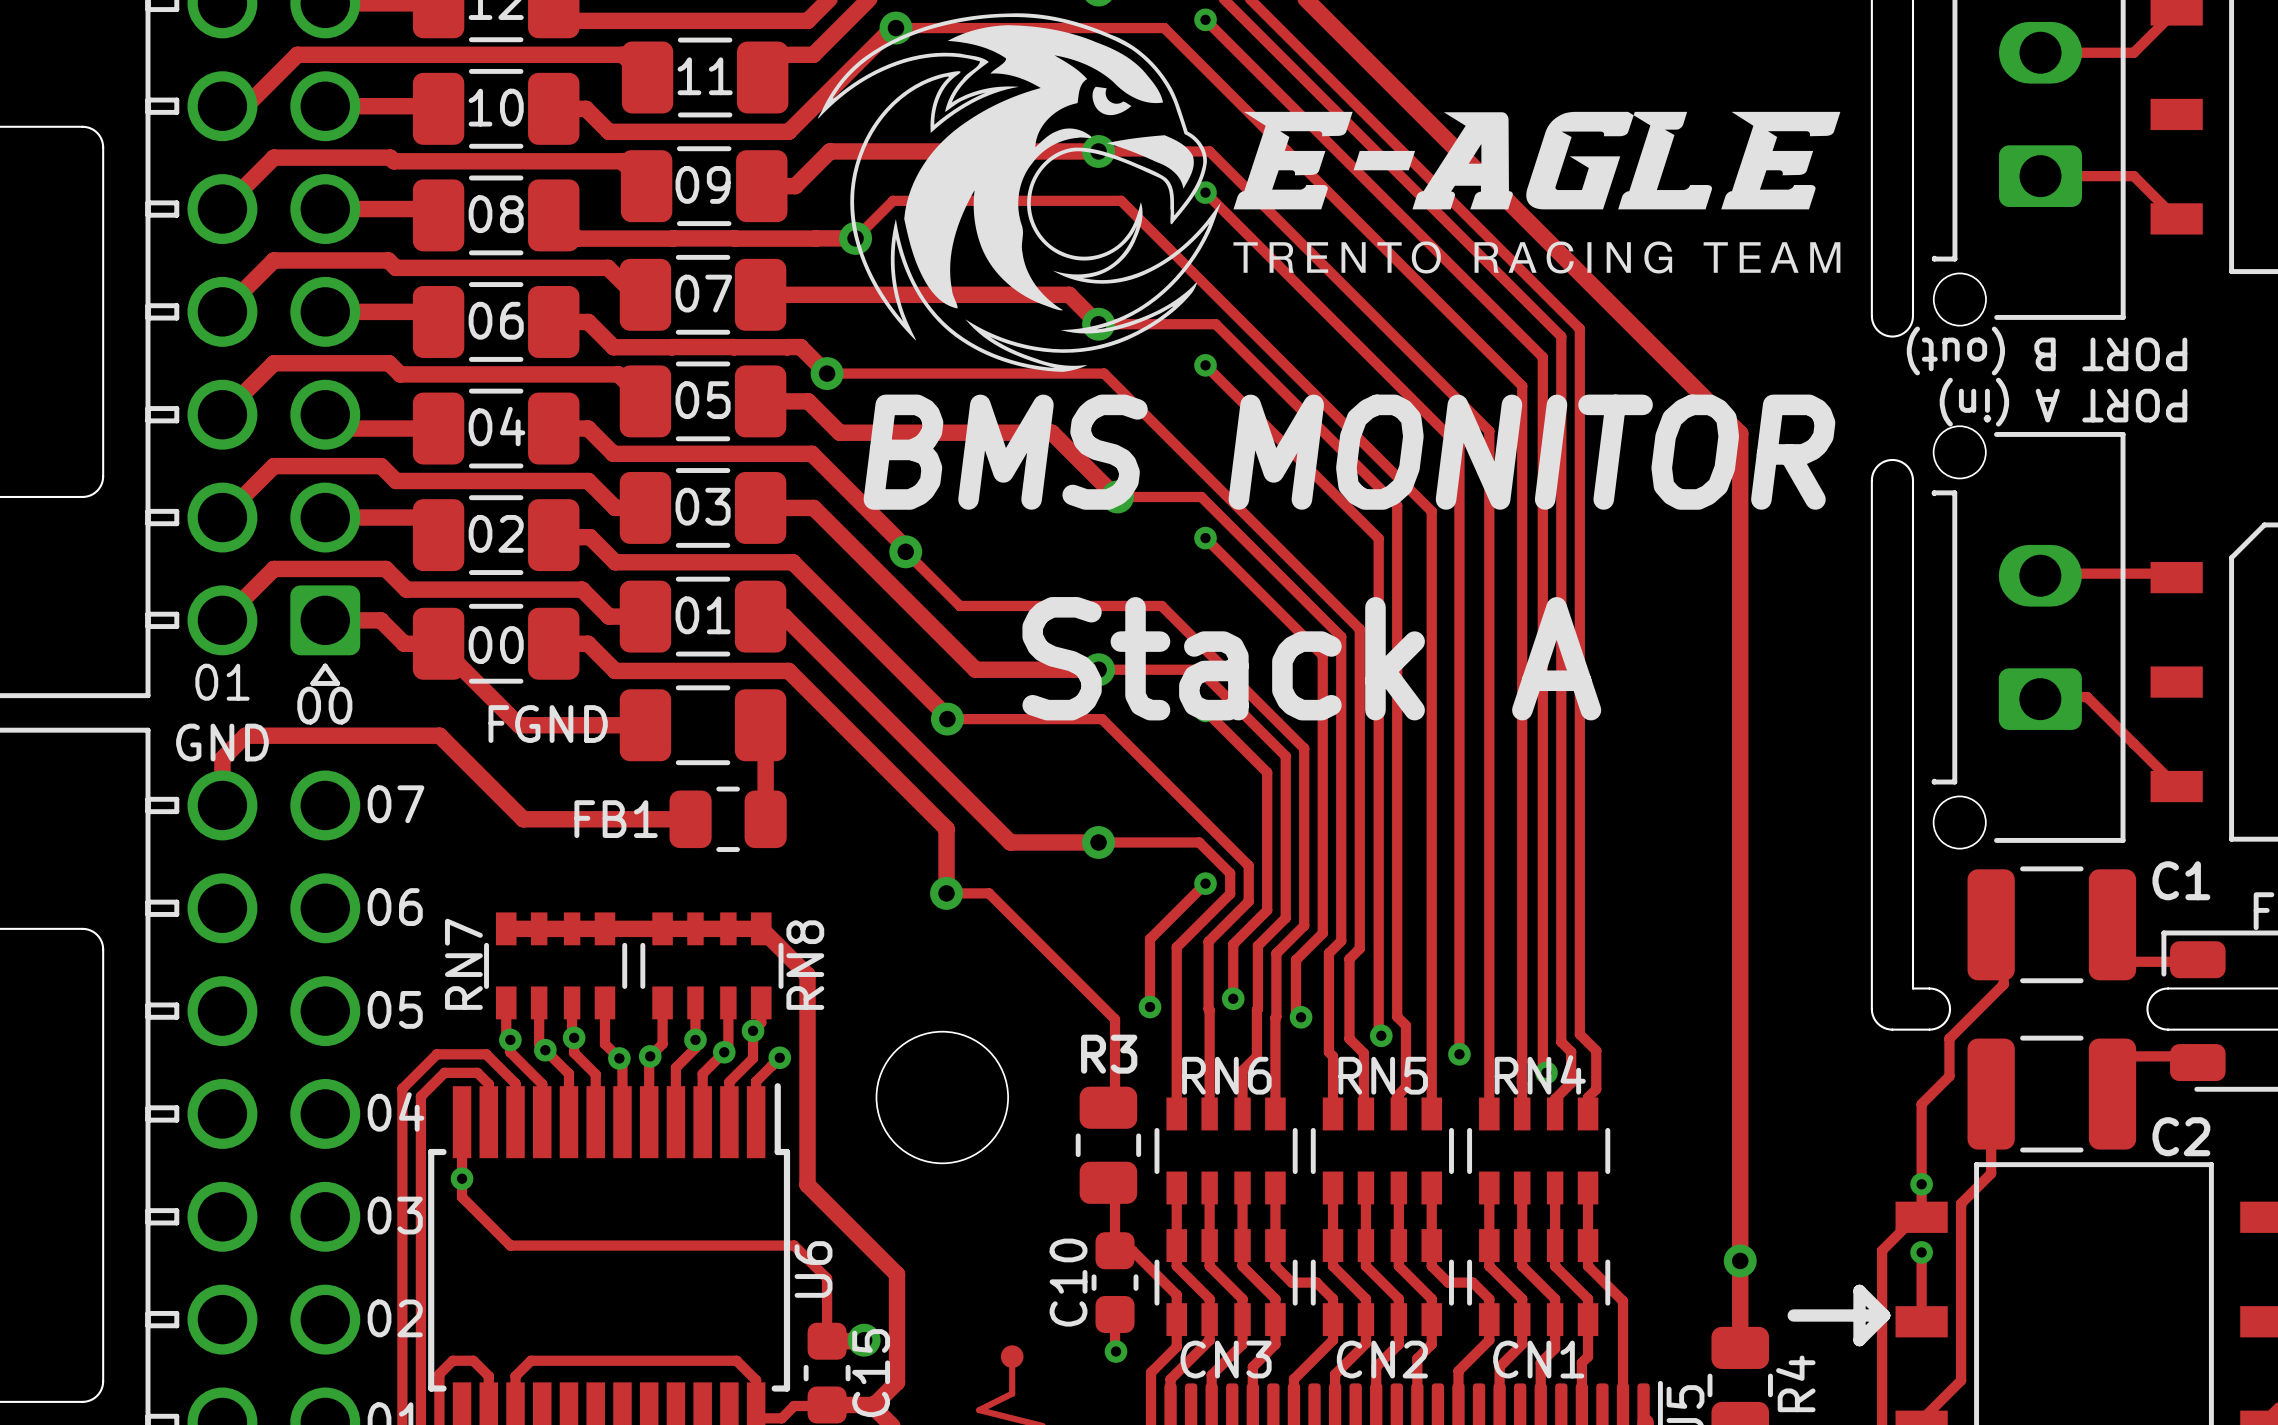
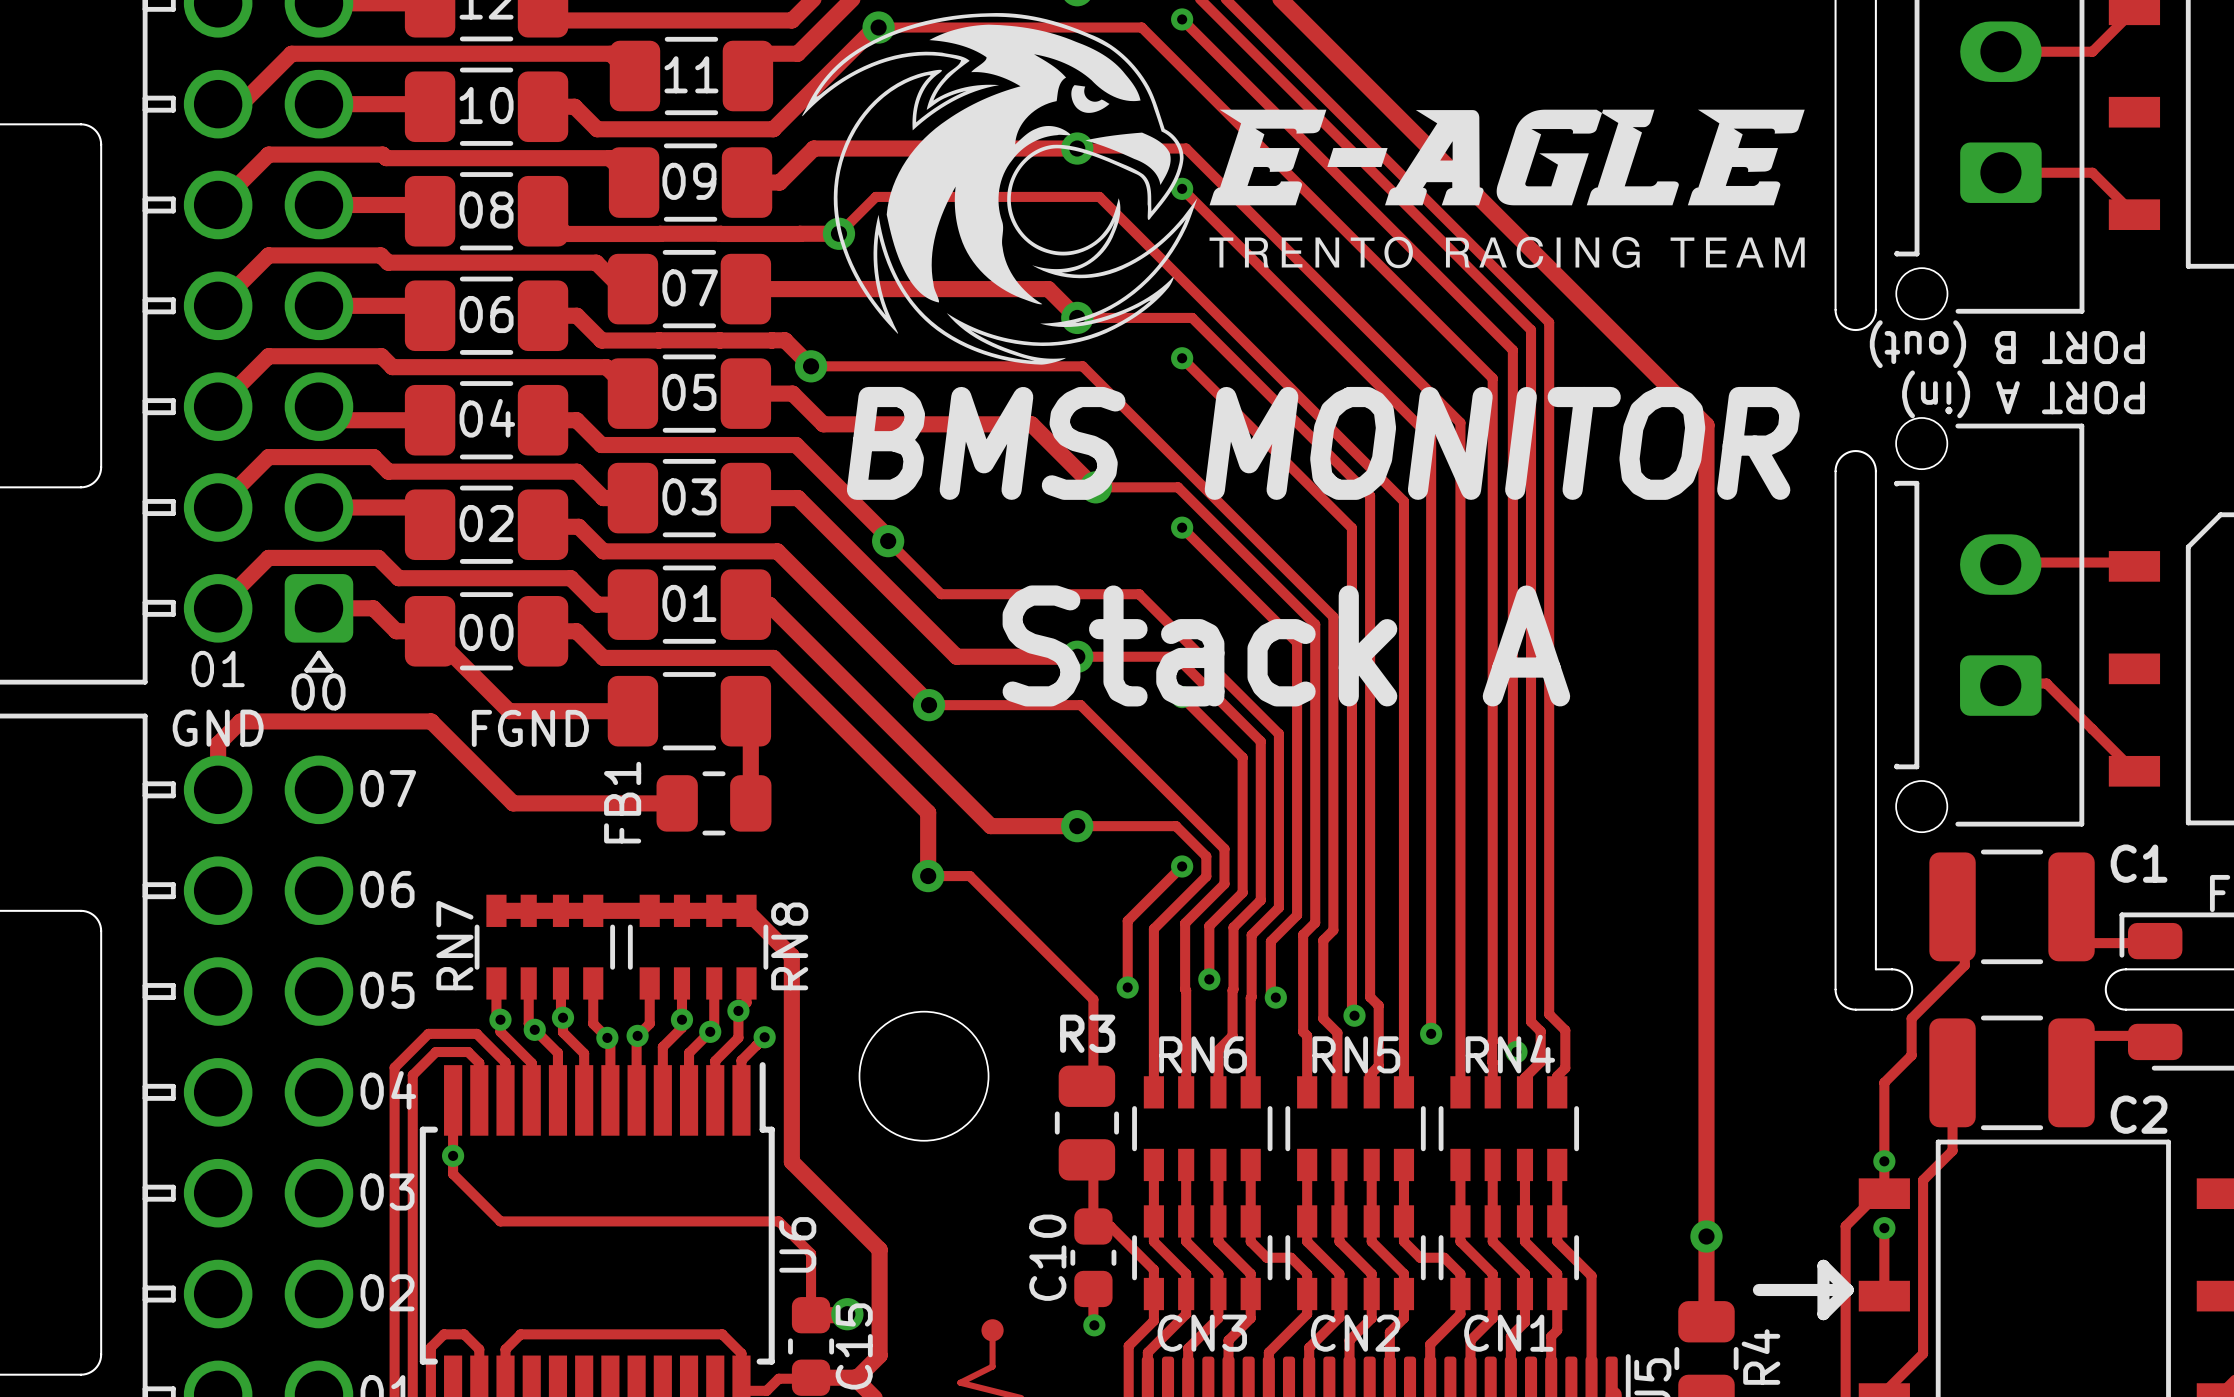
text position: FGND (548, 724) -> FGND (530, 728)
FB1 name rotation: 0° (616, 819) -> 90° counterclockwise (622, 802)

